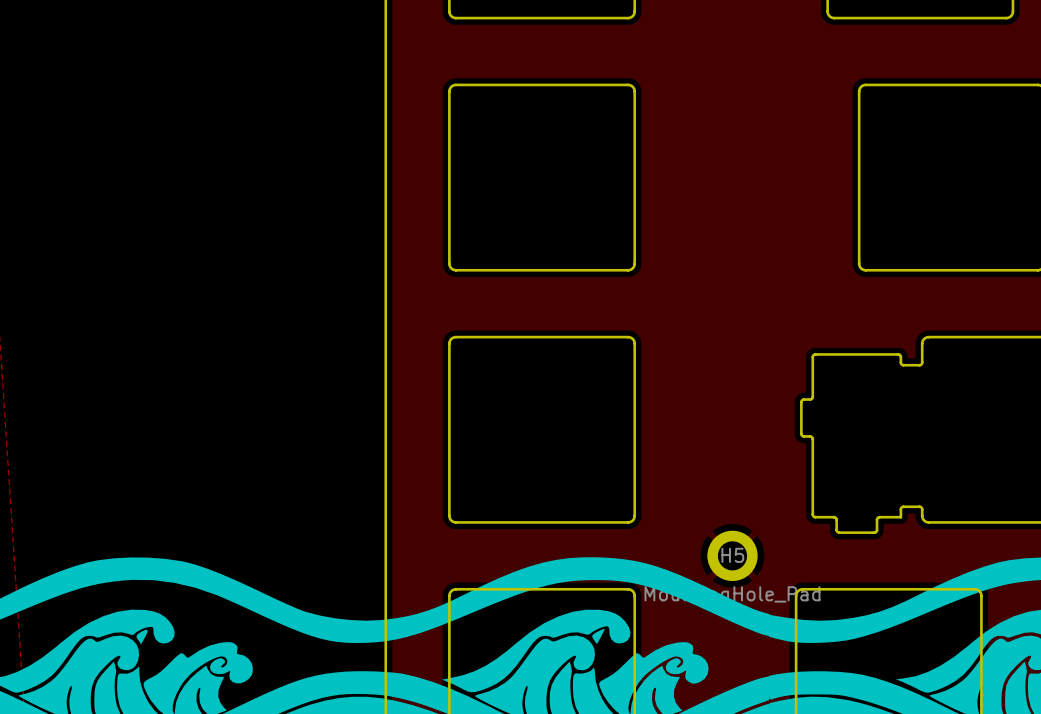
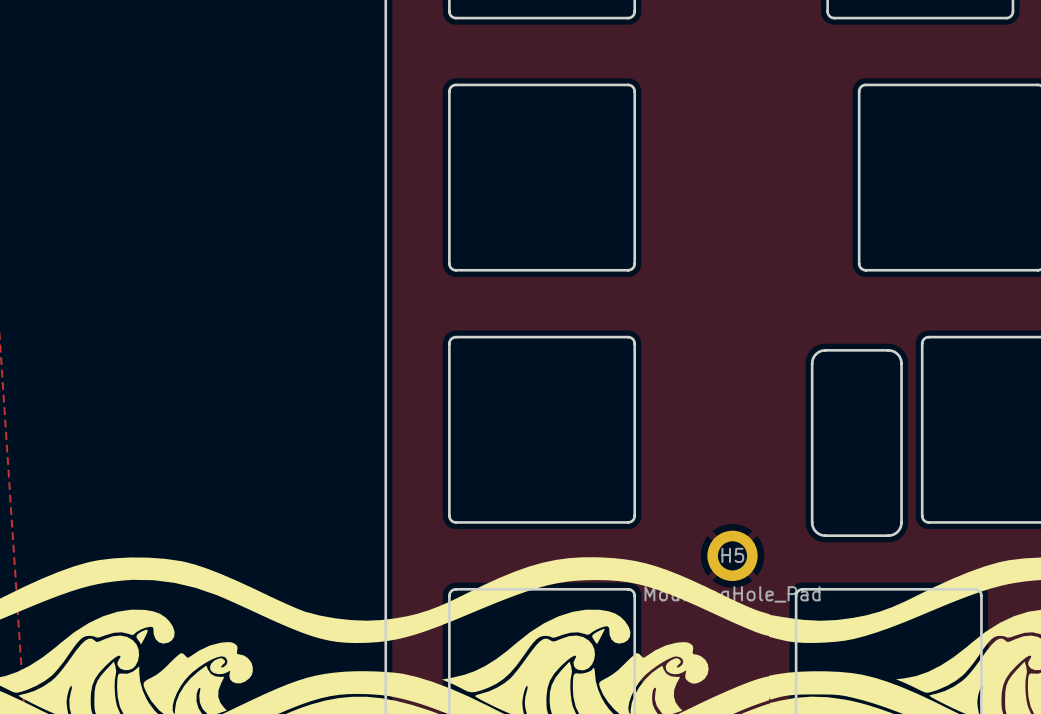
board edge: none -> (825, 350) (890, 350) (896, 353) (900, 358) (901, 522) (899, 529) (893, 534) (823, 535) (817, 532) (813, 527) (812, 361) (815, 354) (825, 350)
board edge: (922, 362) (919, 365) (902, 365) (898, 354) (814, 354) (812, 357) (812, 397) (802, 399) (801, 402) (801, 434) (812, 438) (813, 516) (835, 517) (838, 532) (874, 532) (876, 530) (878, 517) (900, 517) (900, 508) (903, 506) (919, 506) (922, 509) -> (922, 362) (922, 509)

